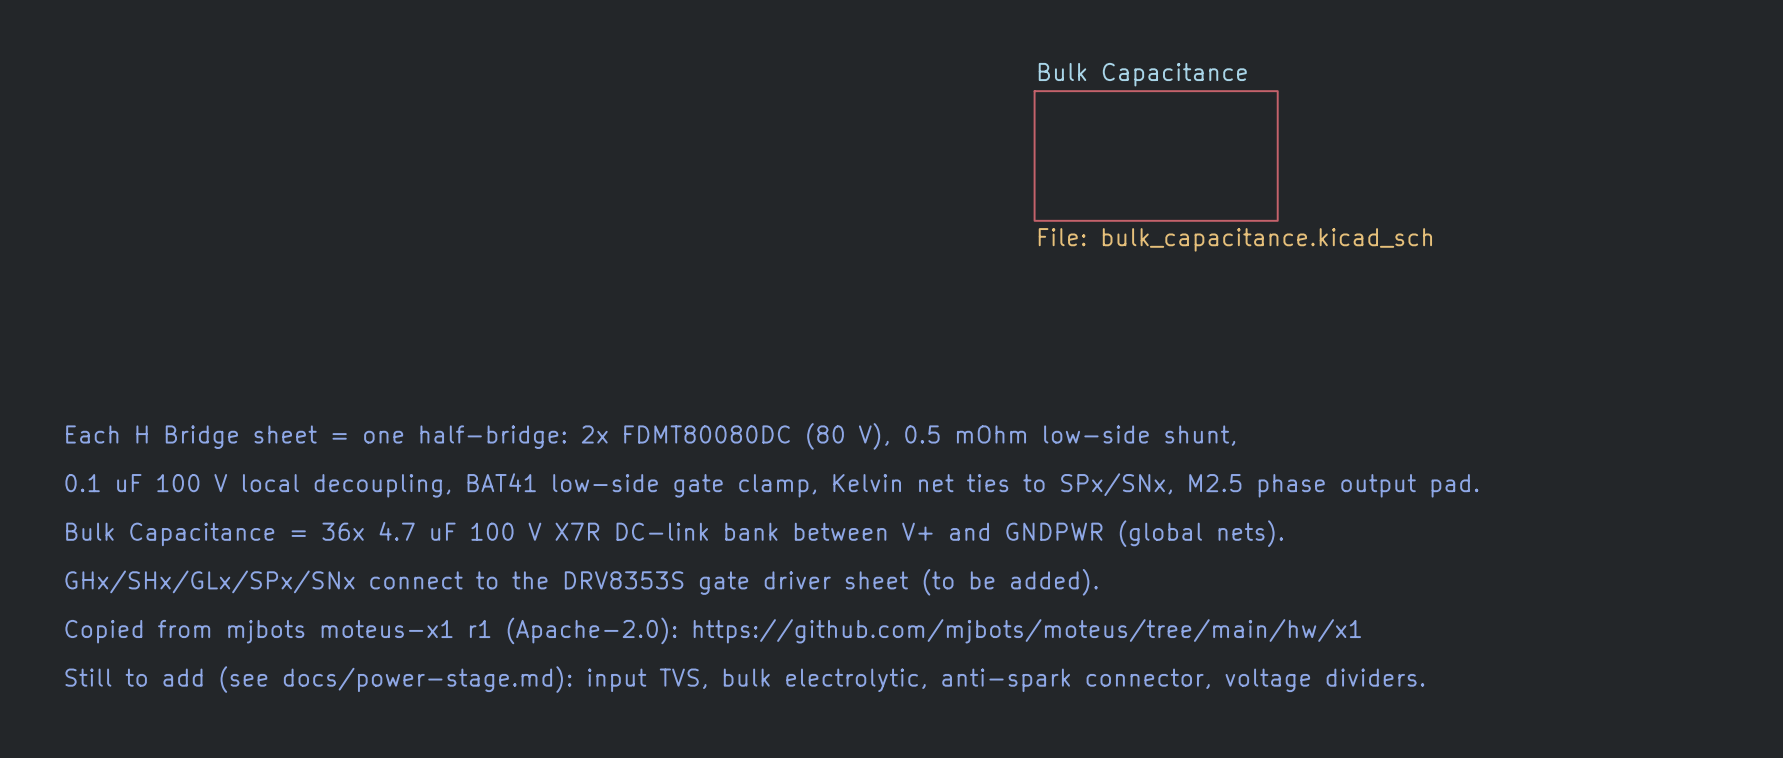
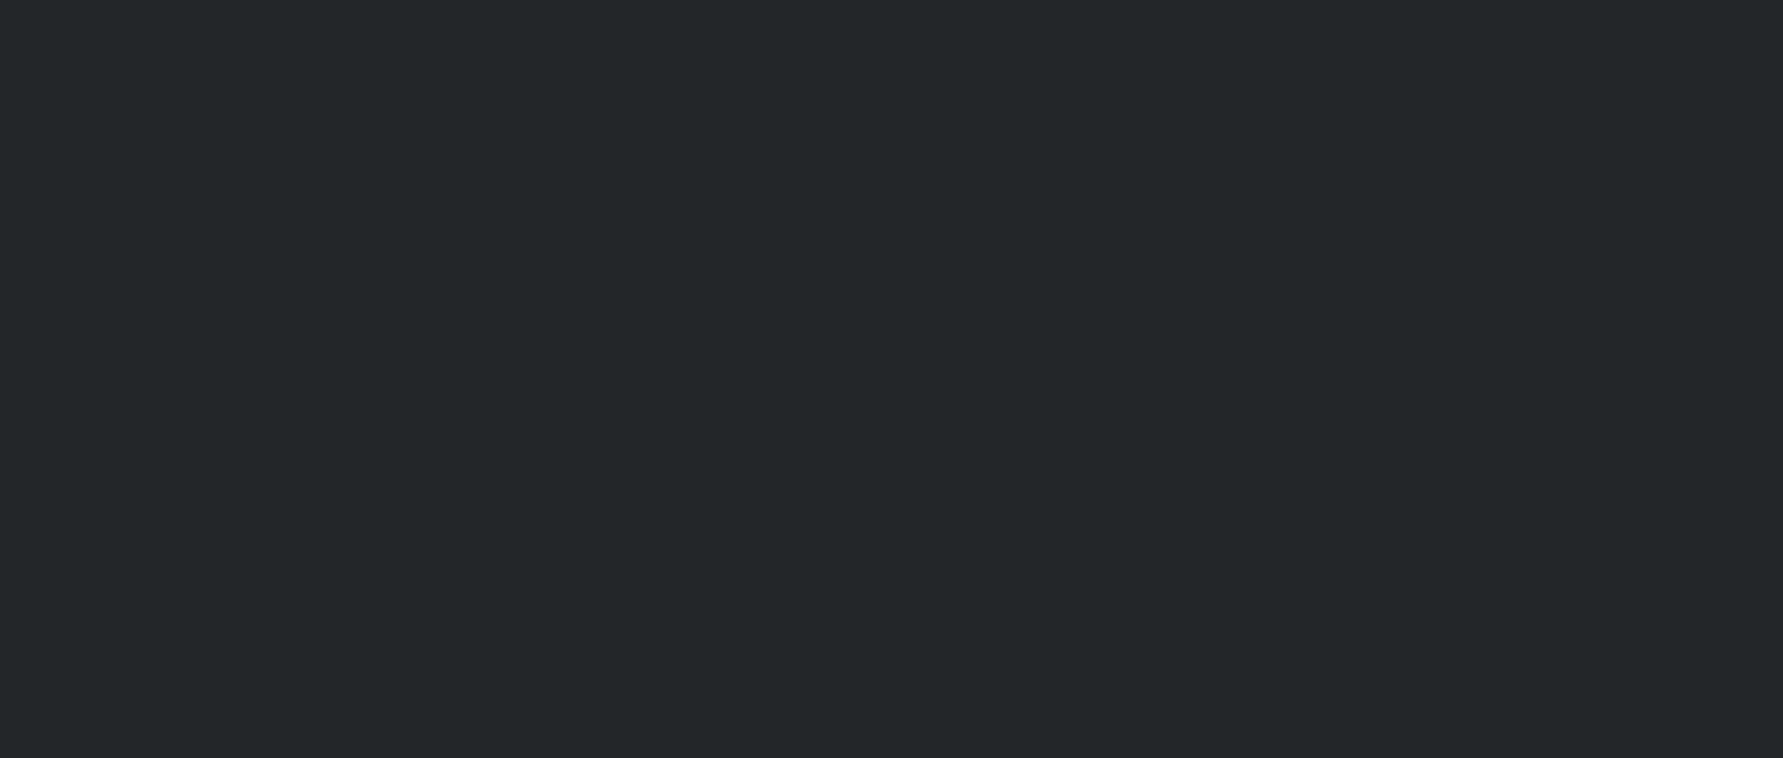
sheet Bulk Capacitance: File: bulk_capacitance.kicad_sch (1156, 155) -> none
text: Each H Bridge sheet = one half-bridge: 2x FDMT80080DC (80 V), 0.5 mOhm low-side shunt, (650, 436) -> none
text: 0.1 uF 100 V local decoupling, BAT41 low-side gate clamp, Kelvin net ties to SPx/SNx, M2.5 phase output pad. (771, 485) -> none
text: Bulk Capacitance = 36x 4.7 uF 100 V X7R DC-link bank between V+ and GNDPWR (global nets). (674, 533) -> none
text: GHx/SHx/GLx/SPx/SNx connect to the DRV8353S gate driver sheet (to be added). (581, 582) -> none
text: Copied from mjbots moteus-x1 r1 (Apache-2.0): https://github.com/mjbots/moteus/tree/main/hw/x1 (713, 630) -> none
text: Still to add (see docs/power-stage.md): input TVS, bulk electrolytic, anti-spark connector, voltage dividers. (744, 679) -> none

